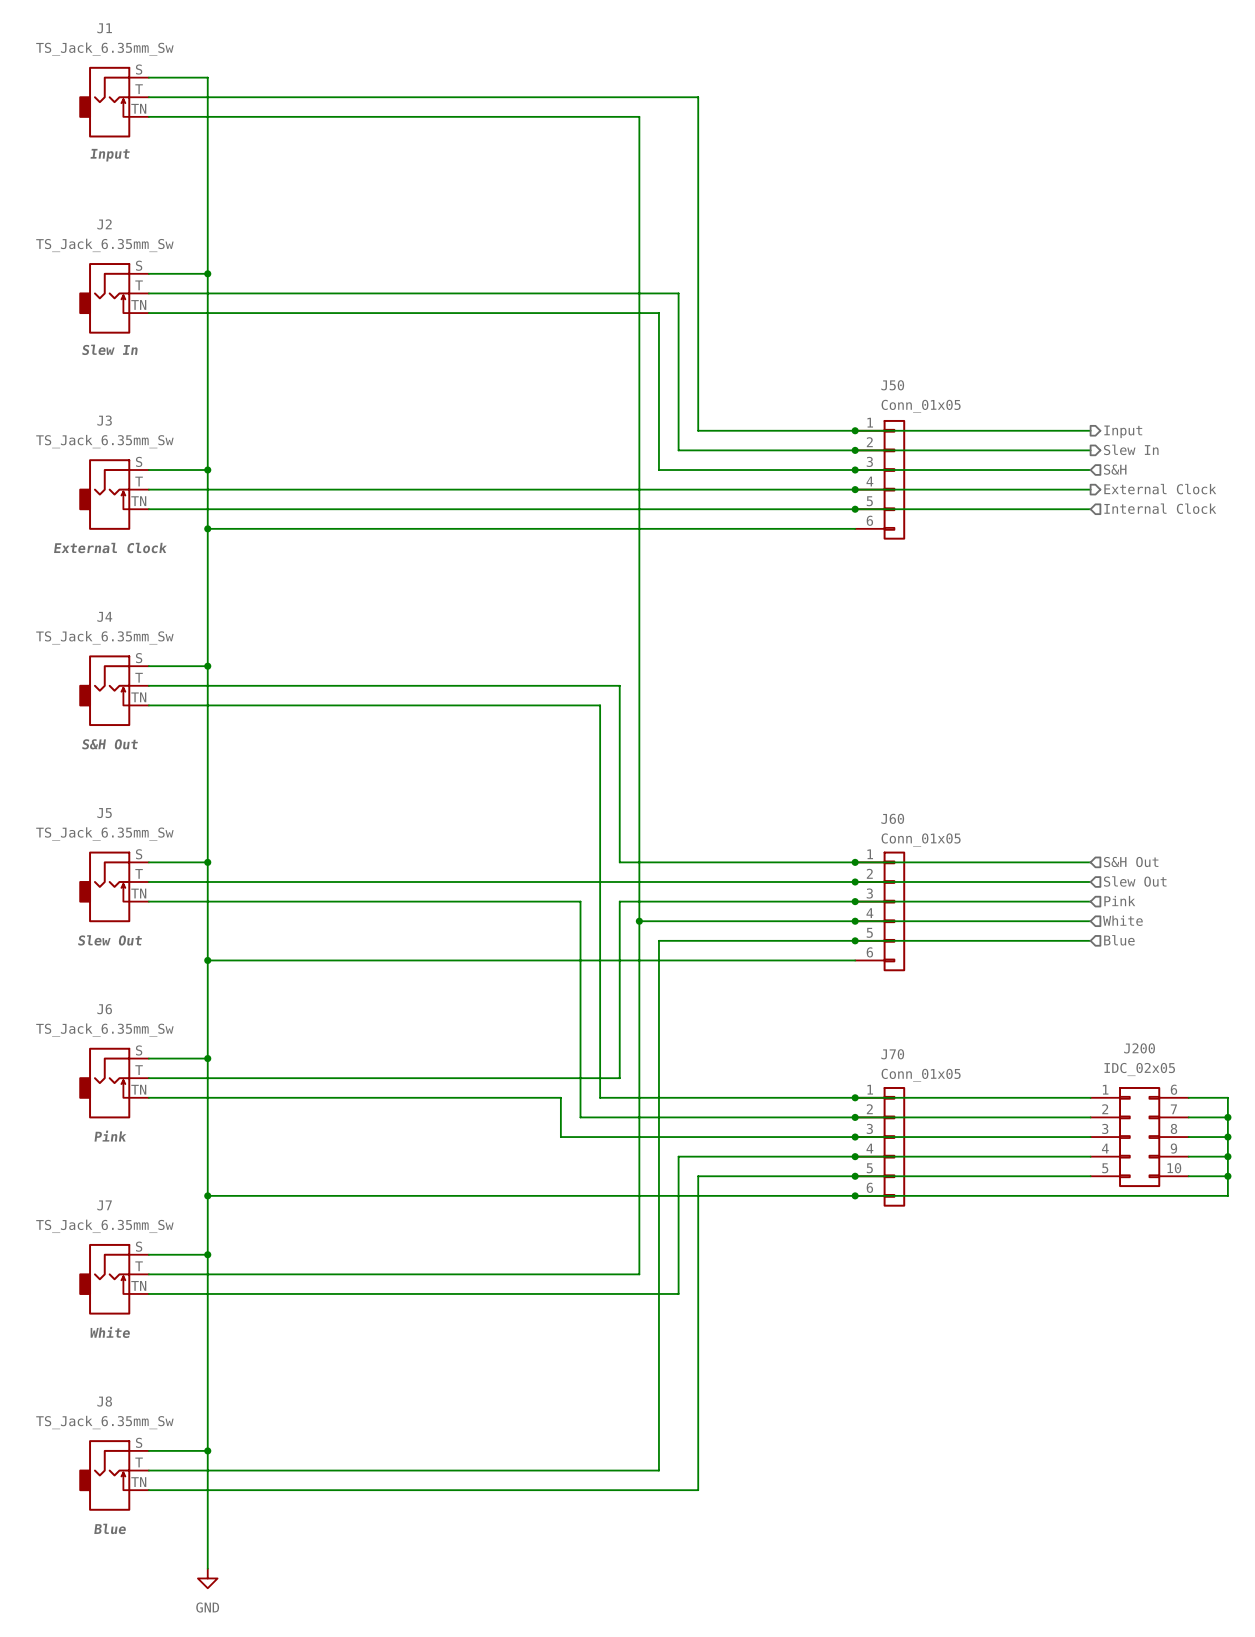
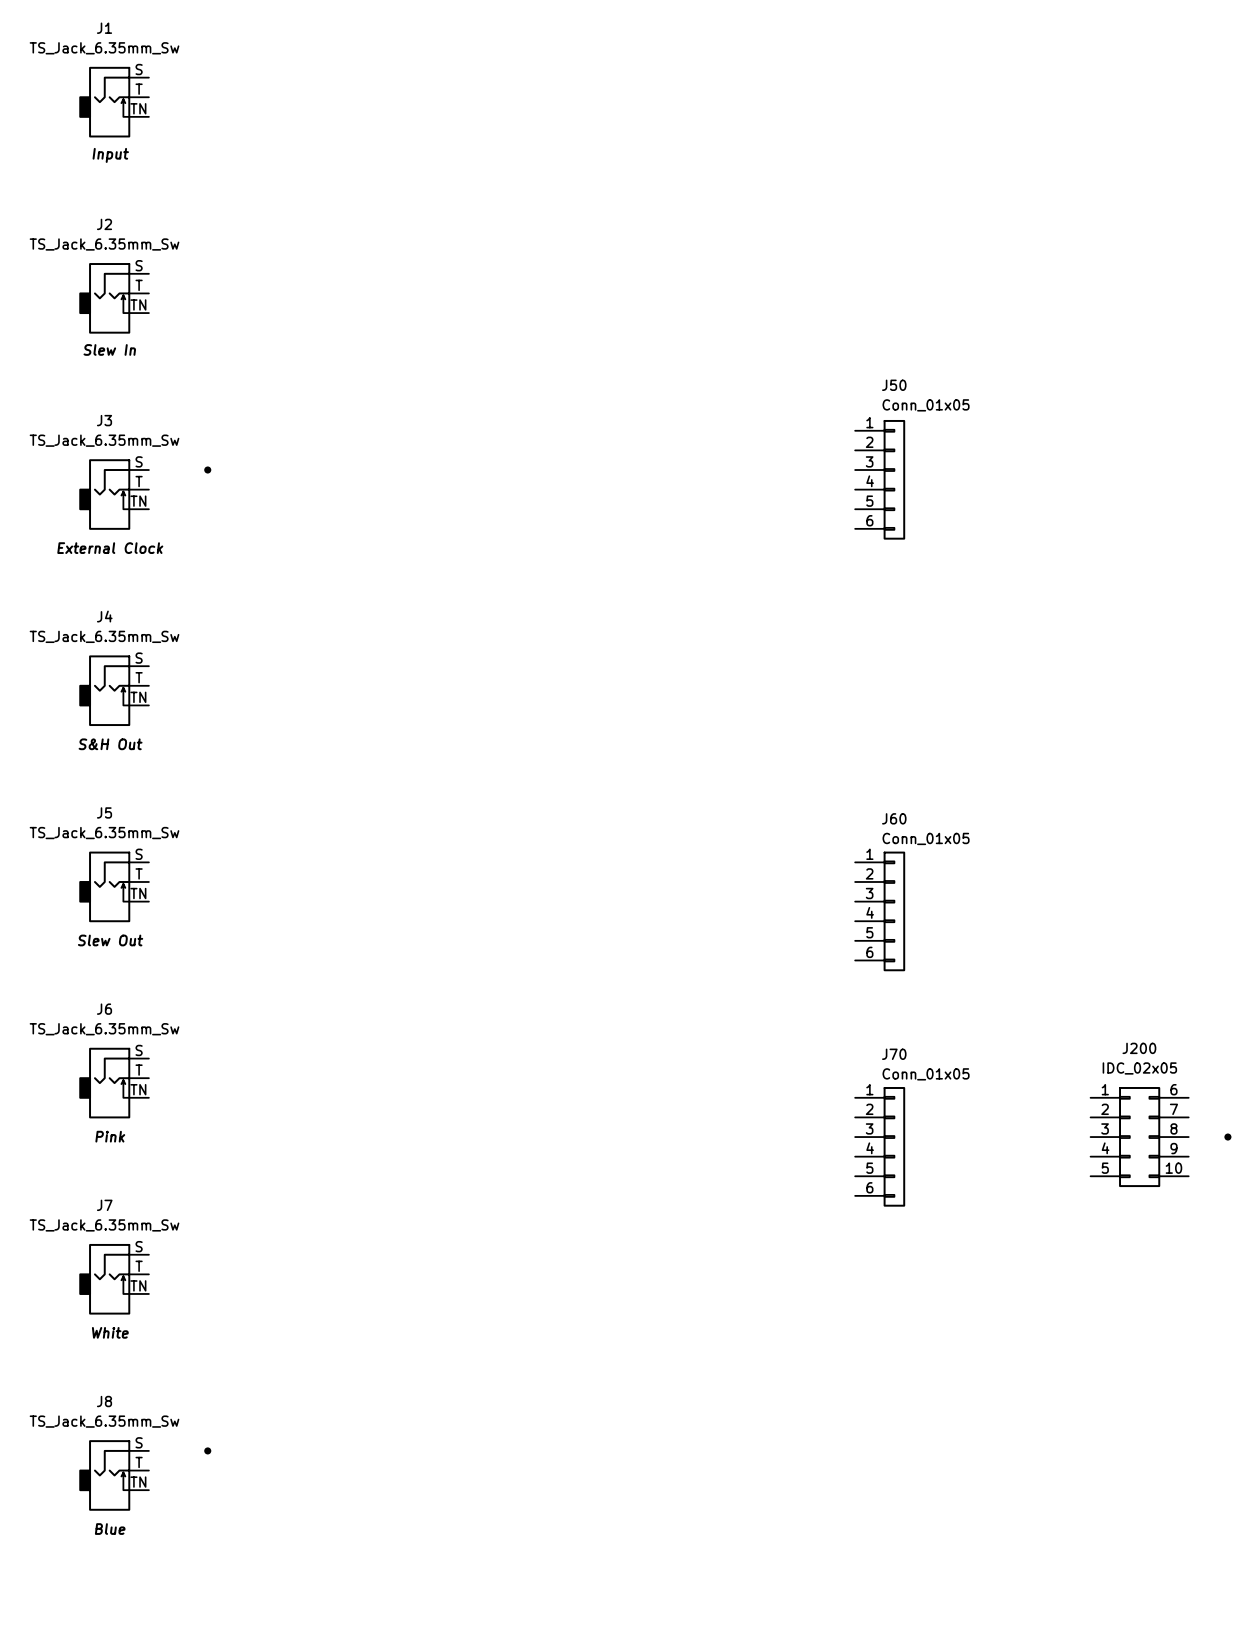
wire: (148, 77) (207, 77) (207, 1568) -> none
wire: (148, 97) (698, 97) (698, 430) (1090, 430) -> none
wire: (148, 116) (639, 116) (639, 1274) (148, 1274) -> none
wire: (148, 273) (207, 273) -> none
junction: (207, 273) -> none
wire: (148, 293) (678, 293) (678, 450) (1090, 450) -> none
wire: (148, 313) (658, 313) (658, 470) (1090, 470) -> none
junction: (855, 430) -> none
hierarchical label: Input (1123, 431) -> none
hierarchical label: Slew In (1131, 449) -> none
junction: (855, 450) -> none
hierarchical label: S&H (1115, 469) -> none
wire: (148, 470) (207, 470) -> none
junction: (855, 470) -> none
wire: (148, 489) (1090, 489) -> none
junction: (855, 489) -> none
hierarchical label: External Clock (1160, 489) -> none
hierarchical label: Internal Clock (1160, 508) -> none
wire: (148, 509) (1090, 509) -> none
junction: (855, 509) -> none
wire: (207, 528) (855, 528) -> none
junction: (207, 528) -> none
wire: (148, 666) (207, 666) -> none
junction: (207, 666) -> none
wire: (148, 685) (619, 685) (619, 862) (1090, 862) -> none
wire: (148, 705) (600, 705) (600, 1097) (1090, 1097) -> none
wire: (148, 862) (207, 862) -> none
junction: (207, 862) -> none
junction: (855, 862) -> none
hierarchical label: S&H Out (1131, 862) -> none
wire: (148, 881) (1090, 881) -> none
junction: (855, 881) -> none
hierarchical label: Slew Out (1135, 881) -> none
wire: (148, 901) (580, 901) (580, 1117) (1090, 1117) -> none
junction: (855, 901) -> none
wire: (1090, 901) (619, 901) (619, 1078) (148, 1078) -> none
hierarchical label: Pink (1119, 901) -> none
hierarchical label: White (1122, 920) -> none
wire: (639, 921) (1090, 921) -> none
junction: (639, 921) -> none
junction: (855, 921) -> none
junction: (855, 940) -> none
wire: (1090, 940) (658, 940) (658, 1470) (148, 1470) -> none
hierarchical label: Blue (1119, 940) -> none
wire: (207, 960) (855, 960) -> none
junction: (207, 960) -> none
wire: (148, 1058) (207, 1058) -> none
junction: (207, 1058) -> none
wire: (148, 1097) (560, 1097) (560, 1137) (1090, 1137) -> none
junction: (855, 1097) -> none
wire: (1188, 1097) (1227, 1097) (1227, 1195) (207, 1195) -> none
junction: (855, 1117) -> none
wire: (1188, 1117) (1227, 1117) -> none
junction: (1227, 1117) -> none
junction: (855, 1137) -> none
wire: (1188, 1137) (1227, 1137) -> none
junction: (855, 1156) -> none
wire: (1090, 1156) (678, 1156) (678, 1293) (148, 1293) -> none
wire: (1188, 1156) (1227, 1156) -> none
junction: (1227, 1156) -> none
junction: (855, 1176) -> none
wire: (1090, 1176) (698, 1176) (698, 1490) (148, 1490) -> none
wire: (1188, 1176) (1227, 1176) -> none
junction: (1227, 1176) -> none
junction: (207, 1195) -> none
junction: (855, 1195) -> none
wire: (148, 1254) (207, 1254) -> none
junction: (207, 1254) -> none
wire: (148, 1450) (207, 1450) -> none
power symbol: GND (207, 1578) -> none

